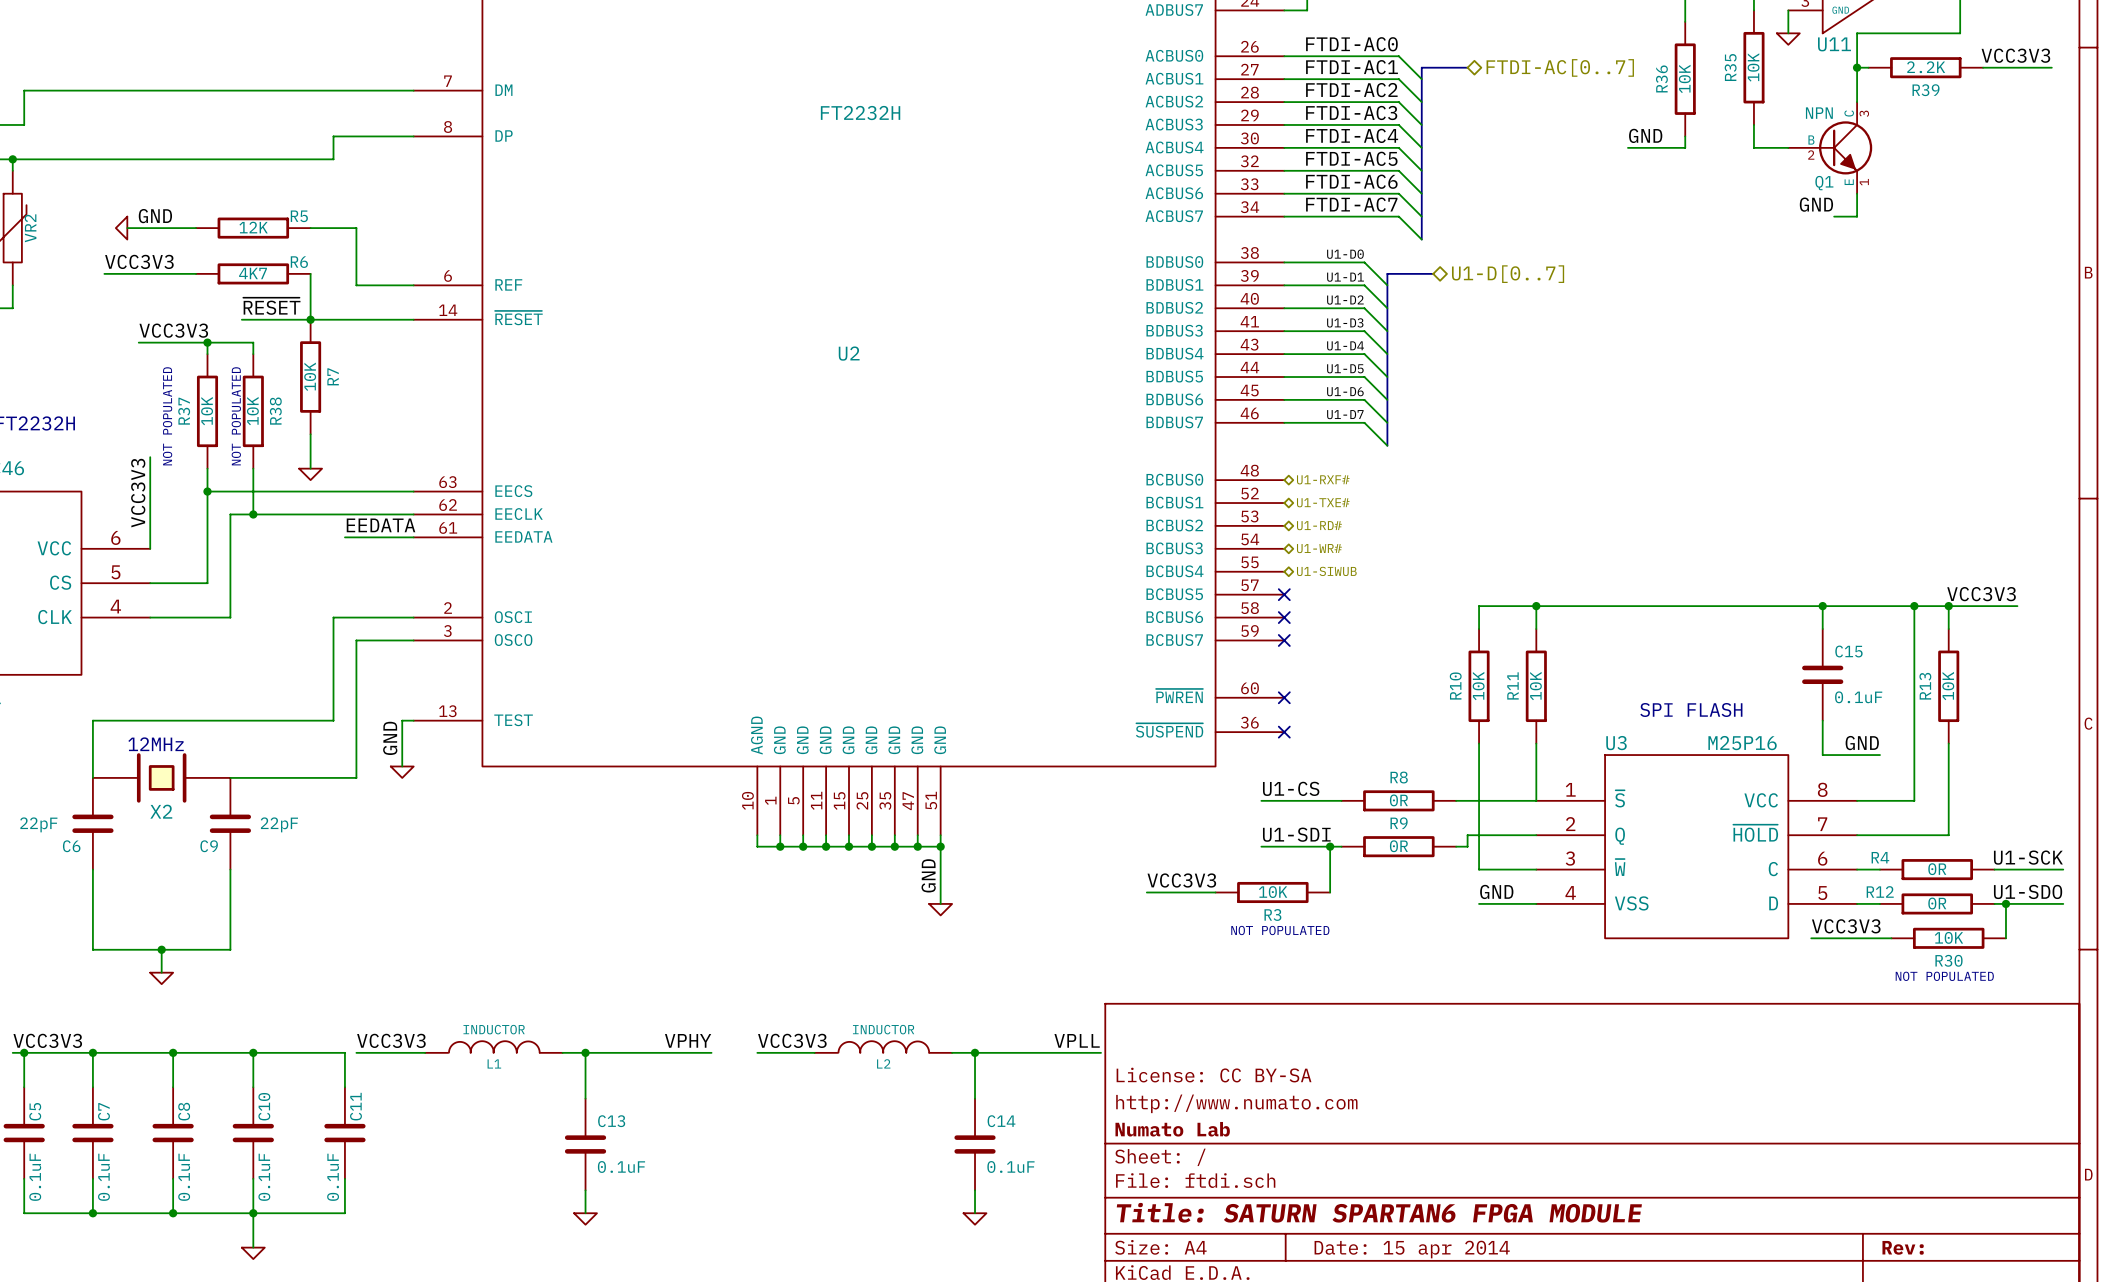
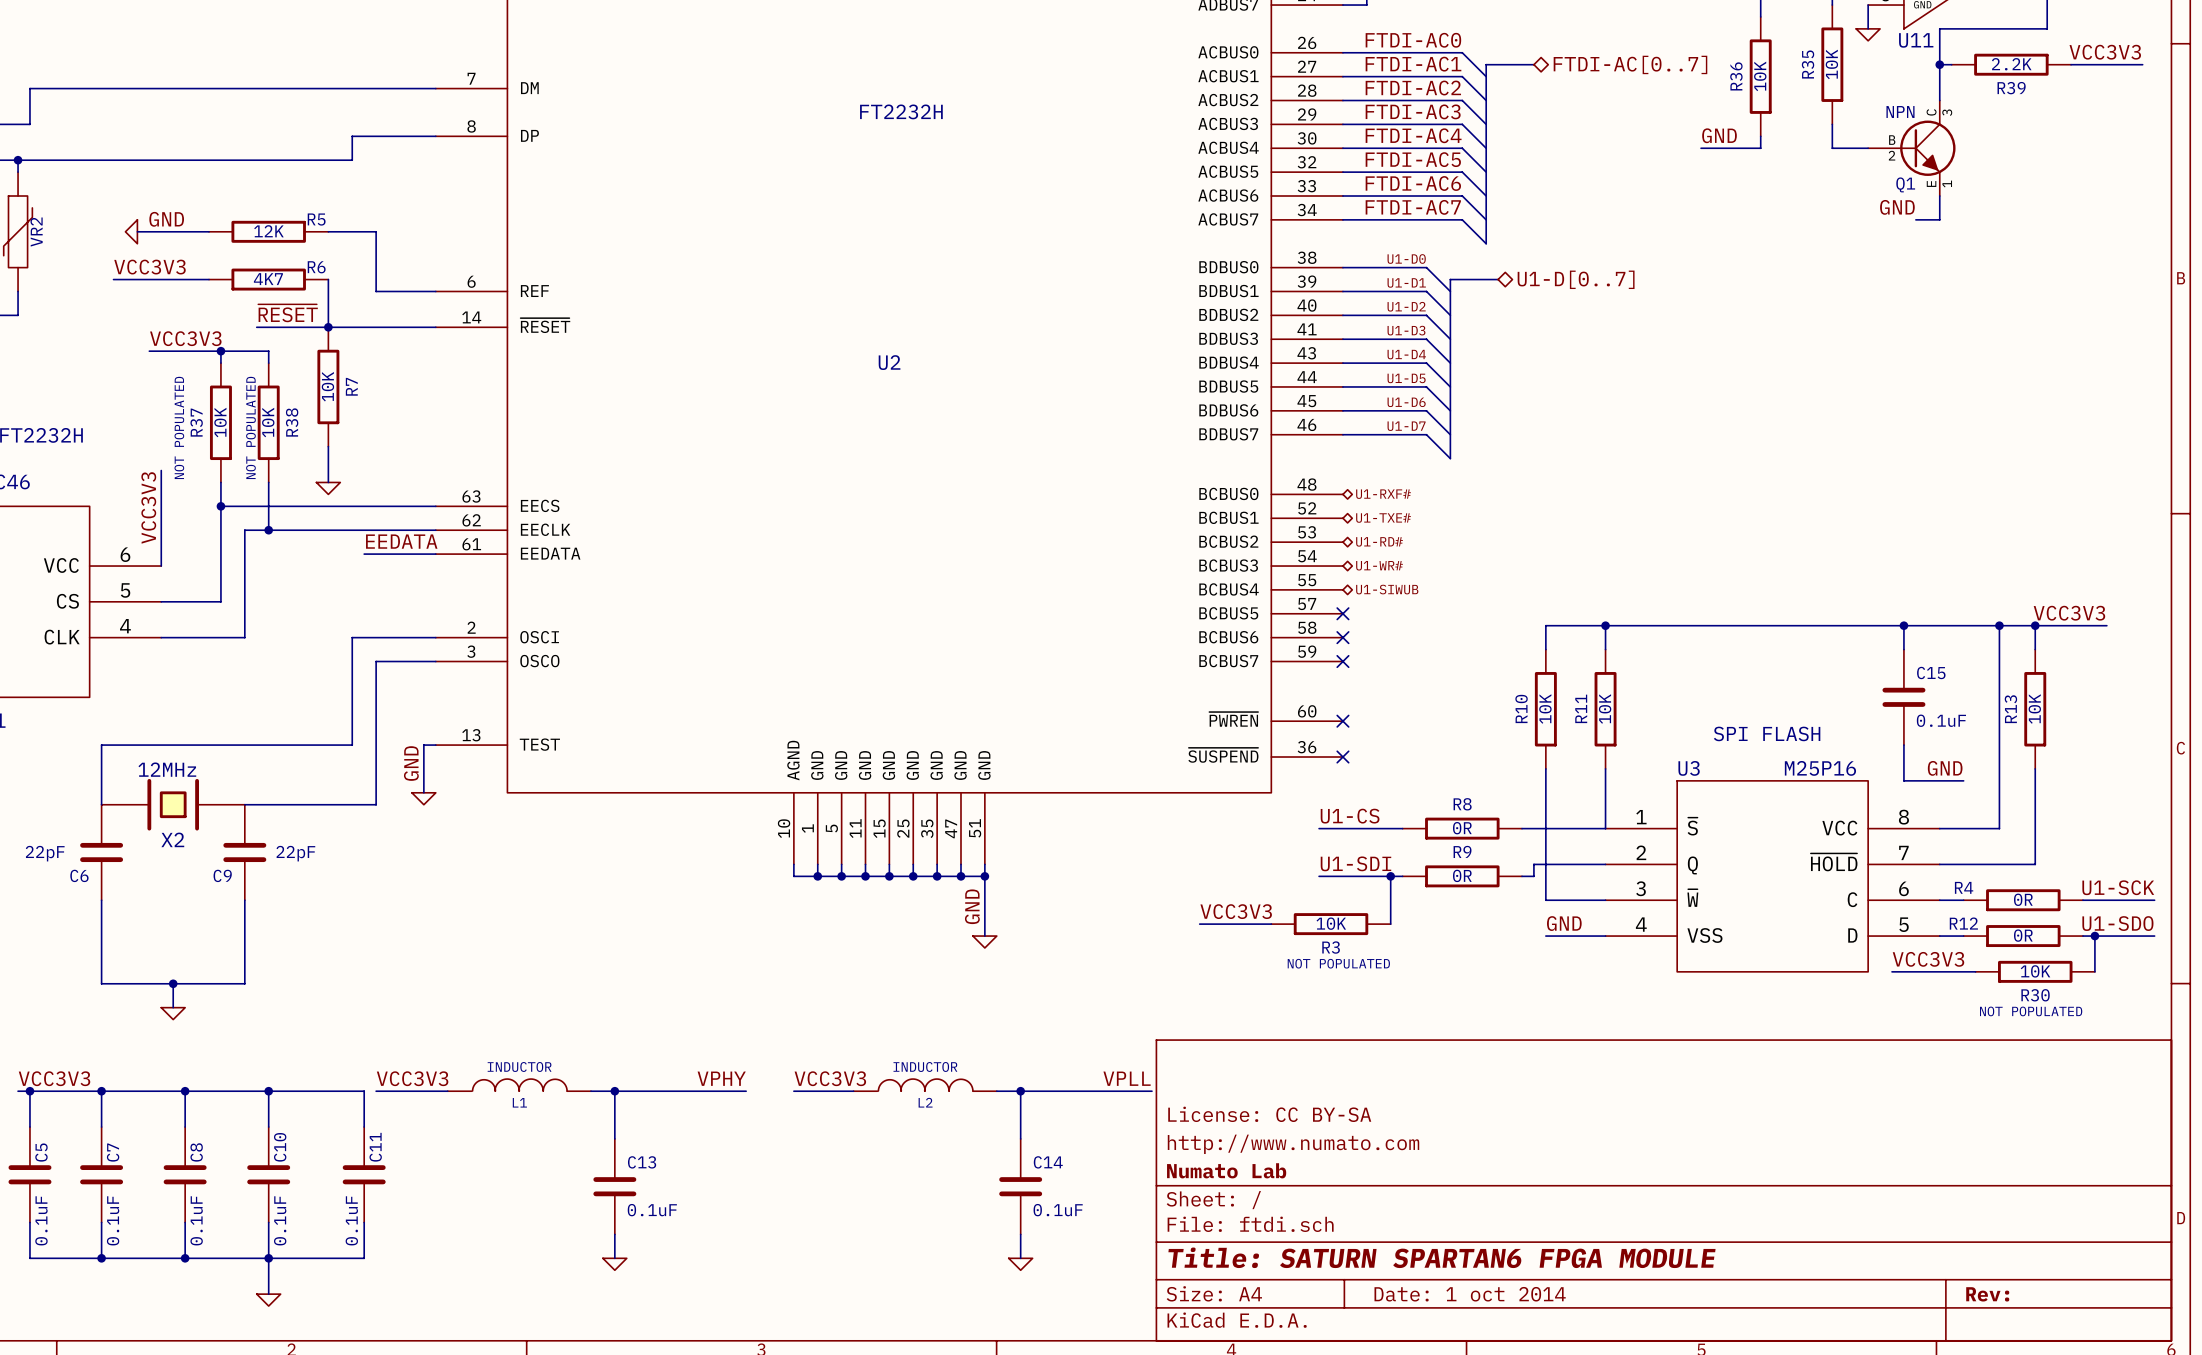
title block: Date: 15 apr 2014 (1412, 1249) -> Date: 1 oct 2014 (1470, 1294)

